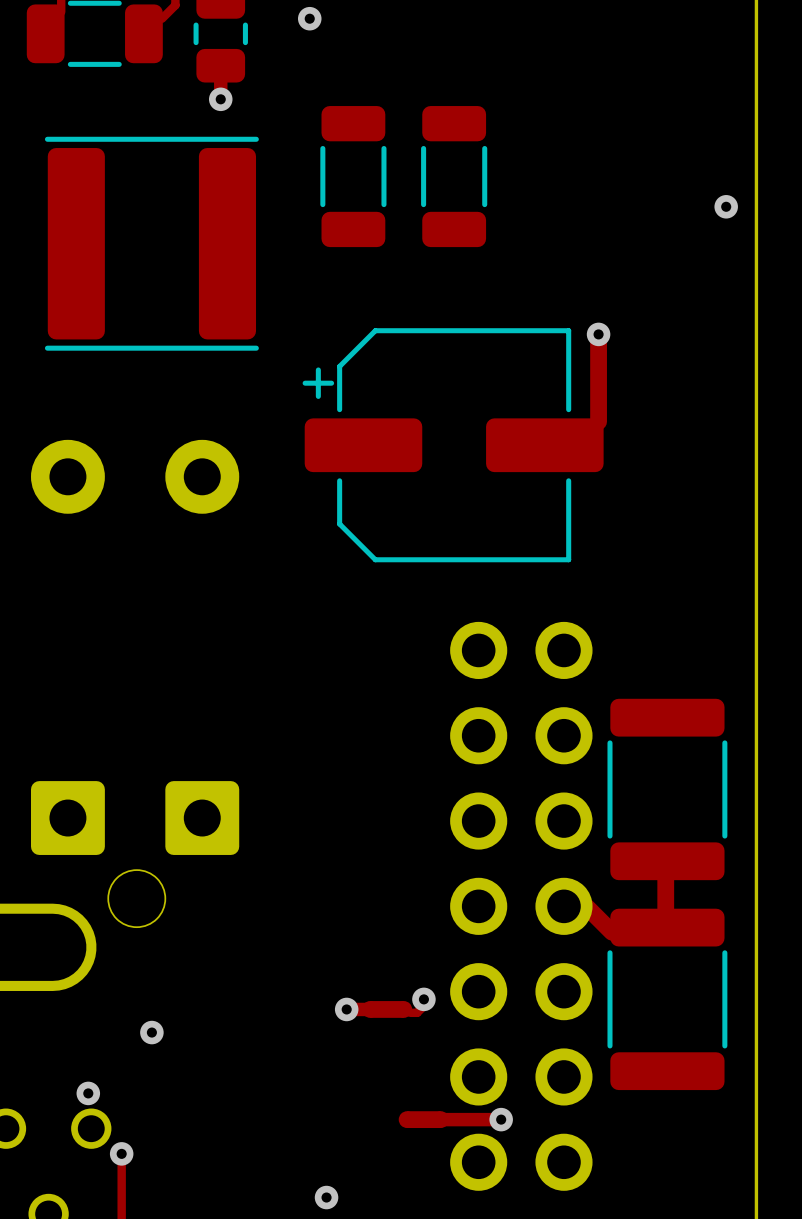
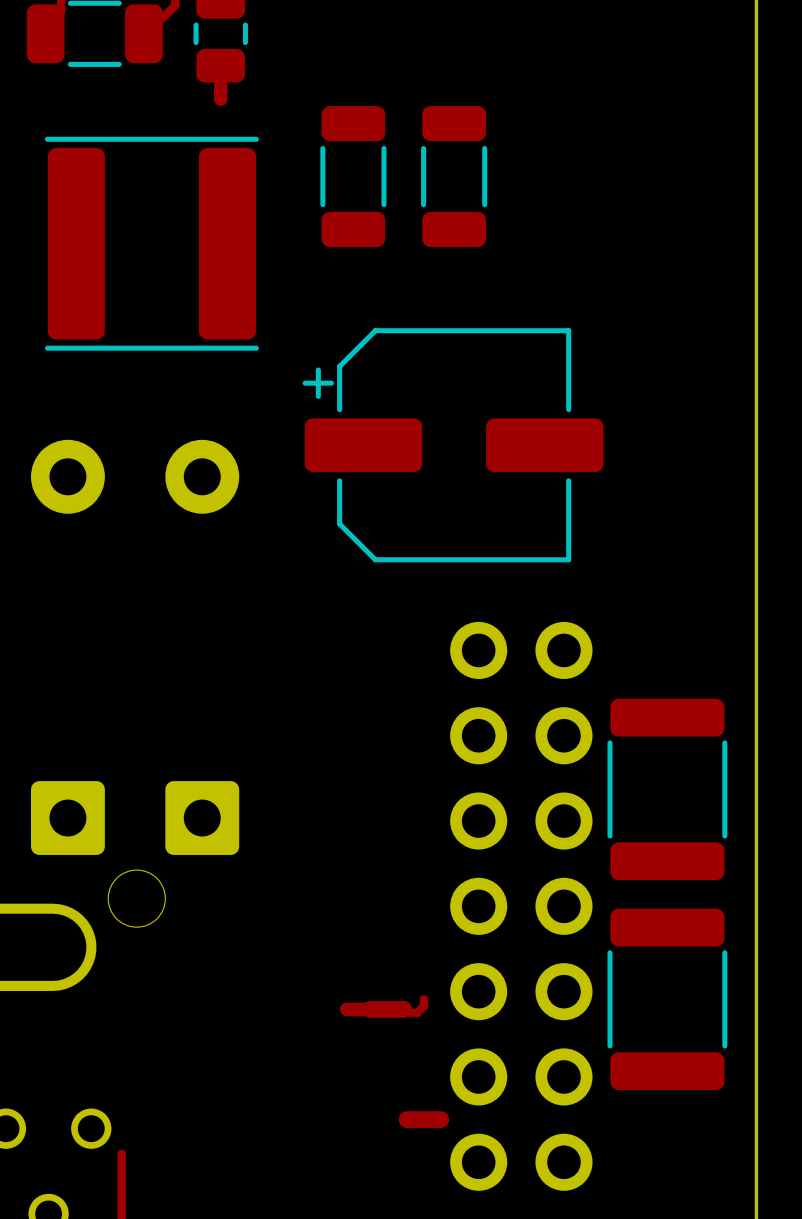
via: (309, 18) -> none
via: (220, 99) -> none
via: (726, 206) -> none
track: (598, 334) (598, 421) -> none
via: (598, 334) -> none
track: (665, 878) (665, 912) -> none
track: (585, 905) (612, 932) -> none
via: (423, 999) -> none
via: (346, 1009) -> none
via: (151, 1032) -> none
via: (88, 1093) -> none
track: (440, 1119) (501, 1119) -> none
via: (501, 1119) -> none
via: (121, 1153) -> none
via: (326, 1197) -> none

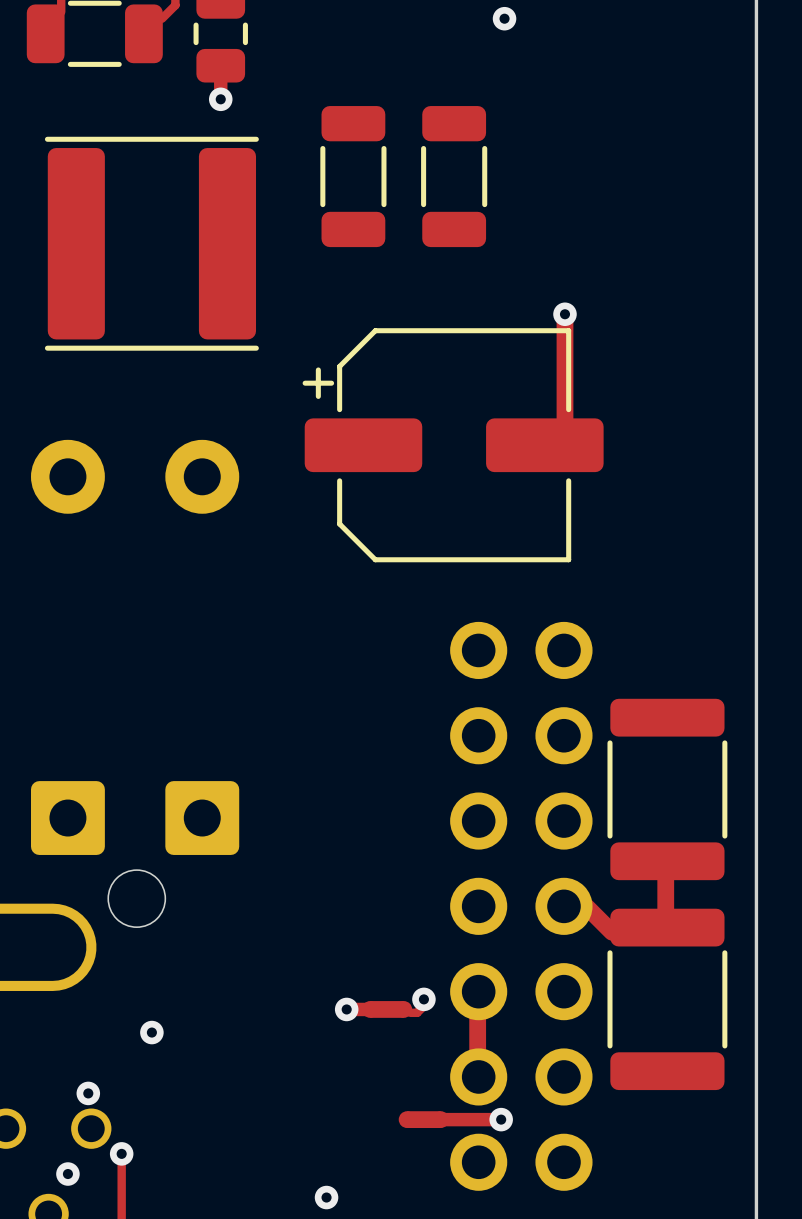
via: none -> (504, 18)
via: none -> (220, 99)
track: none -> (564, 314) (564, 421)
via: none -> (564, 314)
track: none -> (665, 878) (665, 912)
track: none -> (585, 905) (612, 932)
via: none -> (423, 999)
via: none -> (346, 1009)
track: none -> (477, 1012) (477, 1053)
via: none -> (151, 1032)
via: none -> (88, 1093)
track: none -> (440, 1119) (501, 1119)
via: none -> (501, 1119)
via: none -> (121, 1153)
via: none -> (67, 1174)
via: none -> (326, 1197)

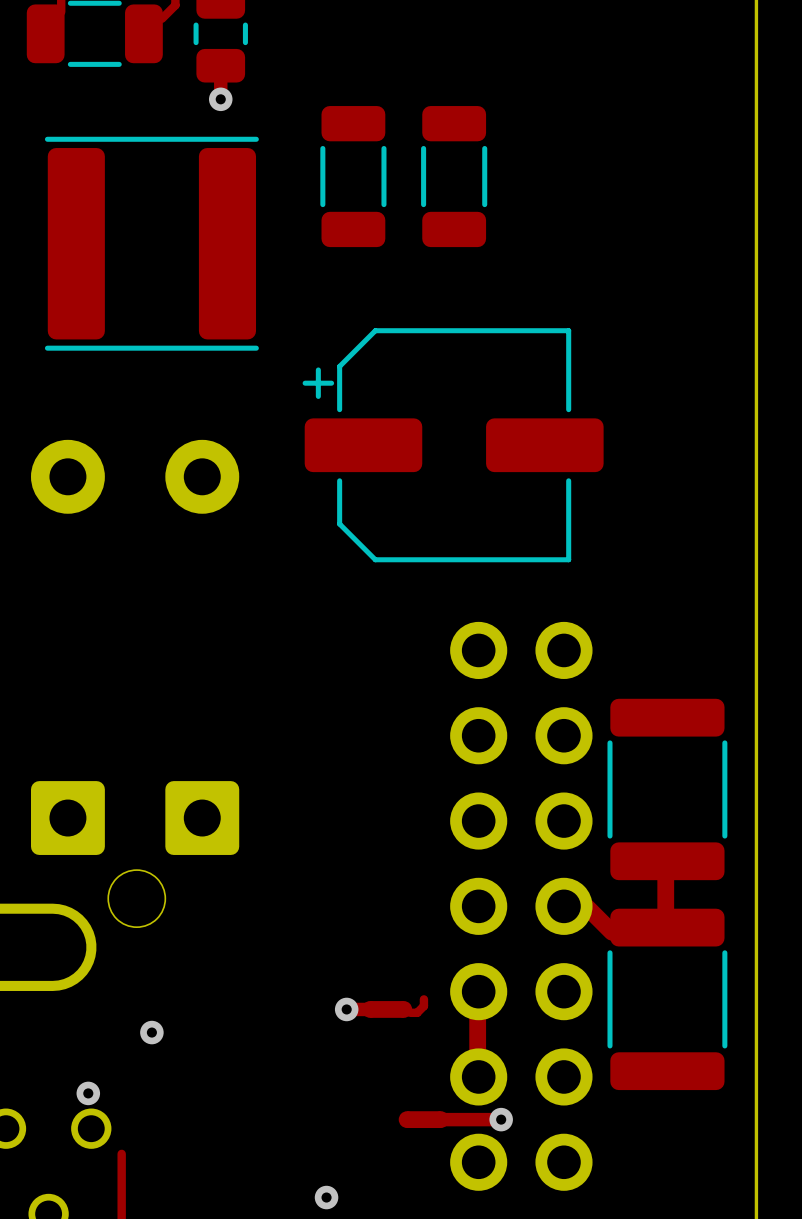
via: (504, 18) -> none
track: (564, 314) (564, 421) -> none
via: (564, 314) -> none
via: (423, 999) -> none
via: (121, 1153) -> none
via: (67, 1174) -> none

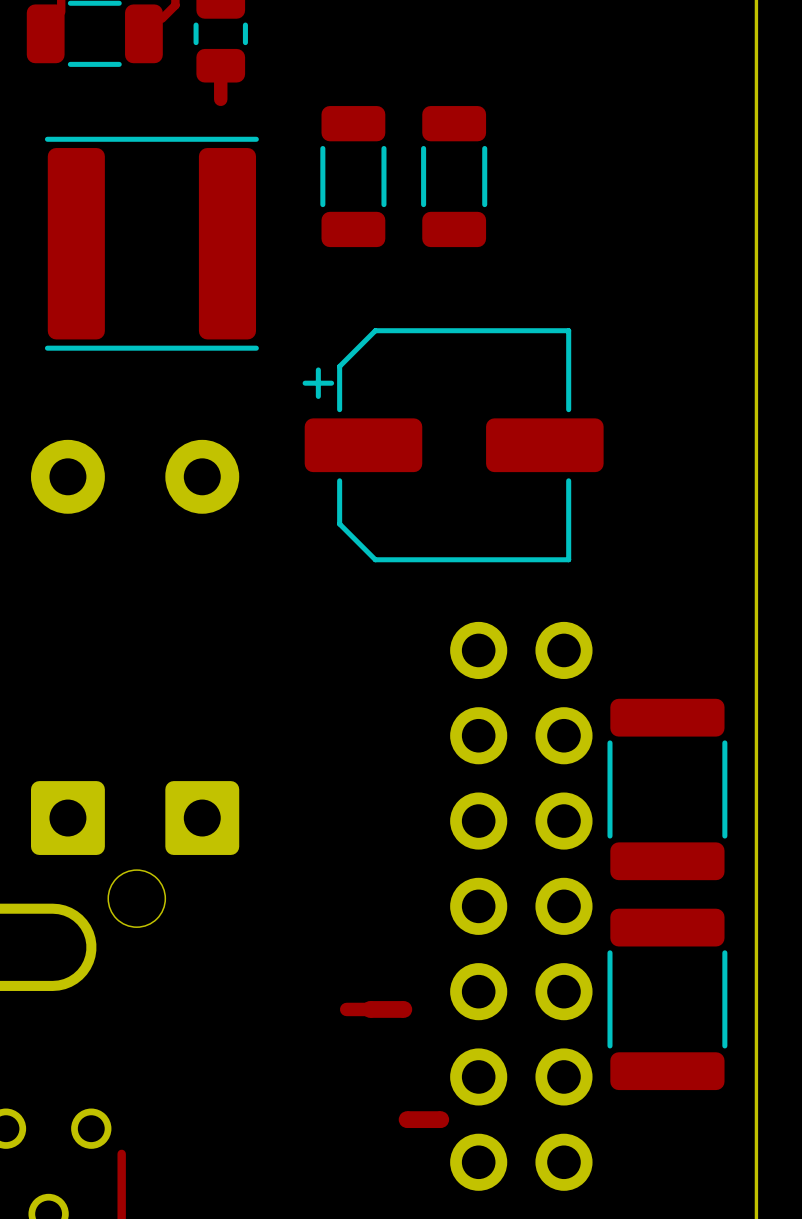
via: (220, 99) -> none
track: (665, 878) (665, 912) -> none
track: (585, 905) (612, 932) -> none
track: (423, 999) (423, 1006) (417, 1012) (410, 1012) -> none
via: (346, 1009) -> none
track: (477, 1012) (477, 1053) -> none
via: (151, 1032) -> none
via: (88, 1093) -> none
track: (440, 1119) (501, 1119) -> none
via: (501, 1119) -> none
via: (326, 1197) -> none

